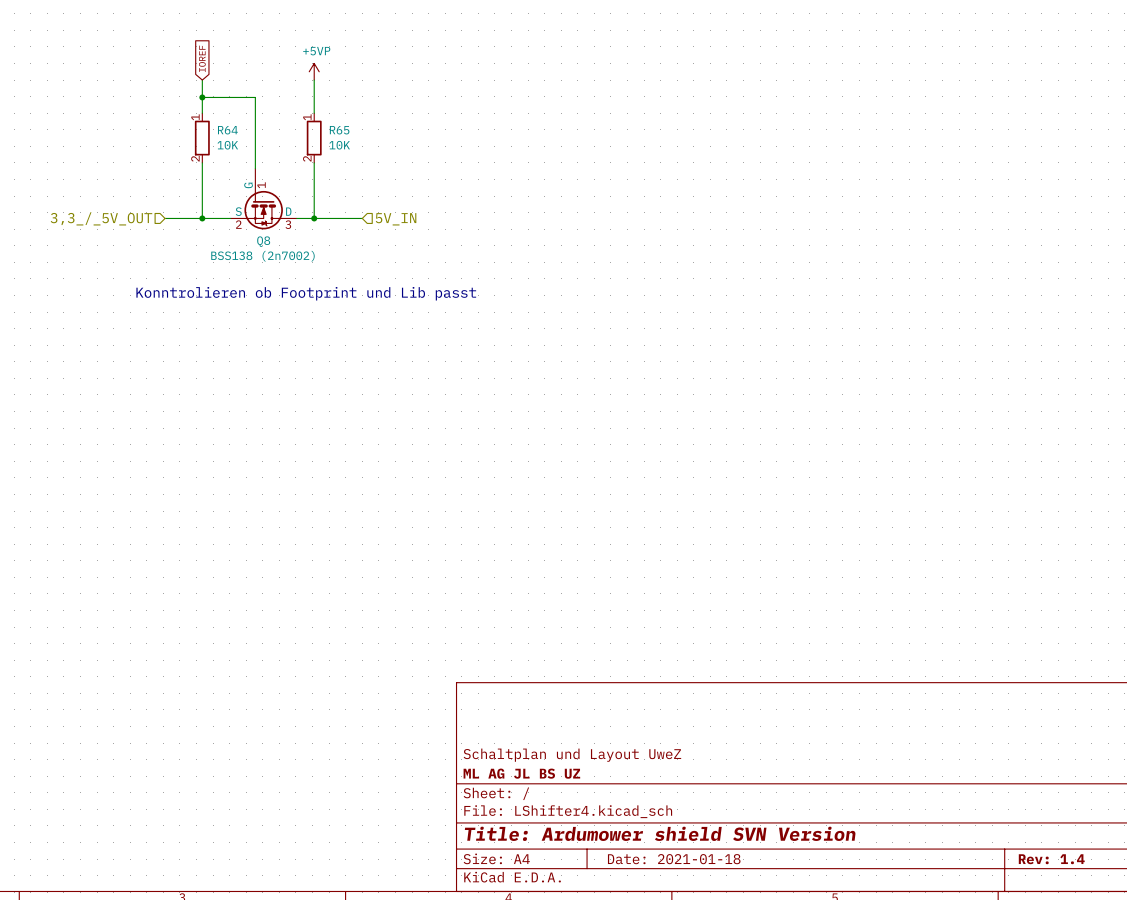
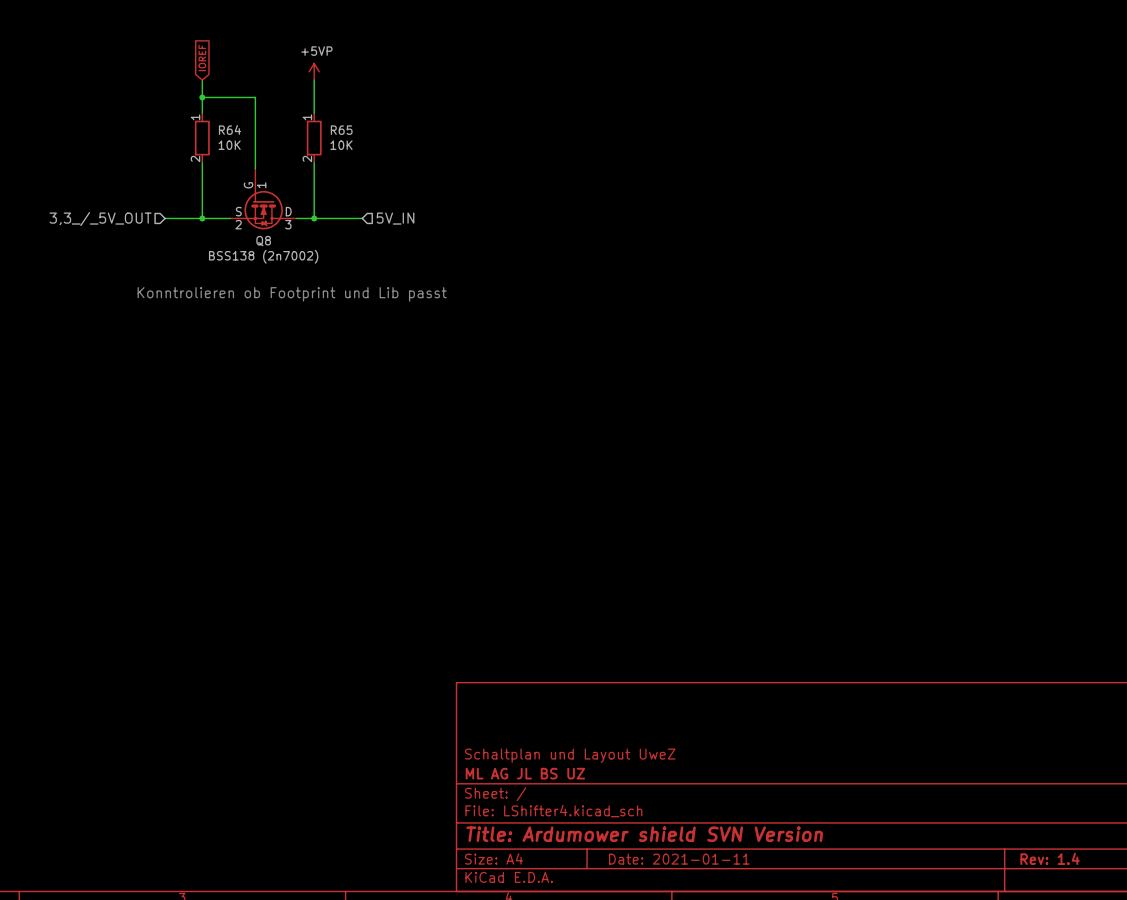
title block: Date: 2021-01-18 (674, 859) -> Date: 2021-01-11 (679, 859)

